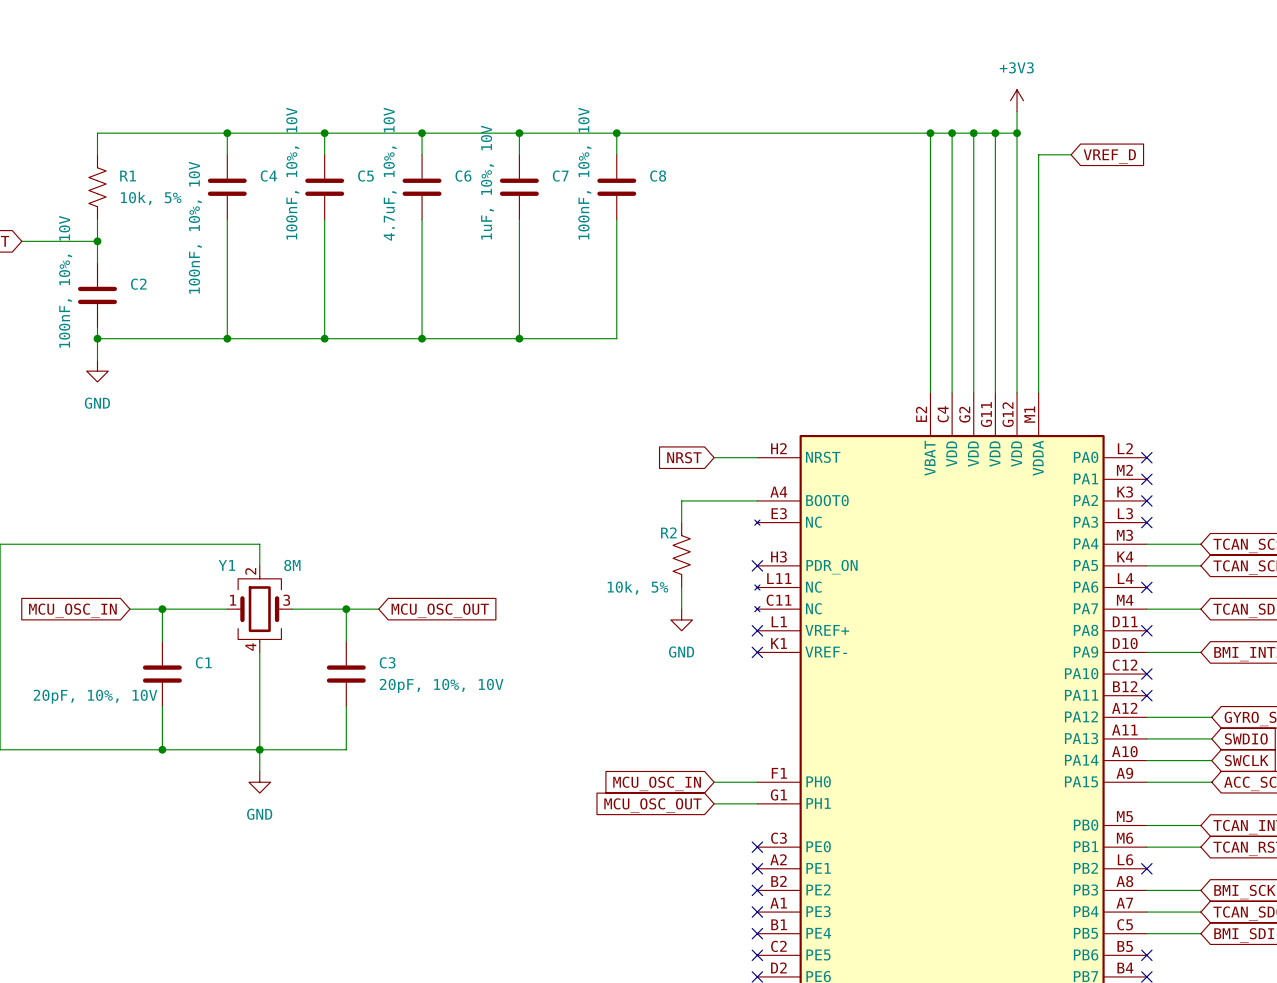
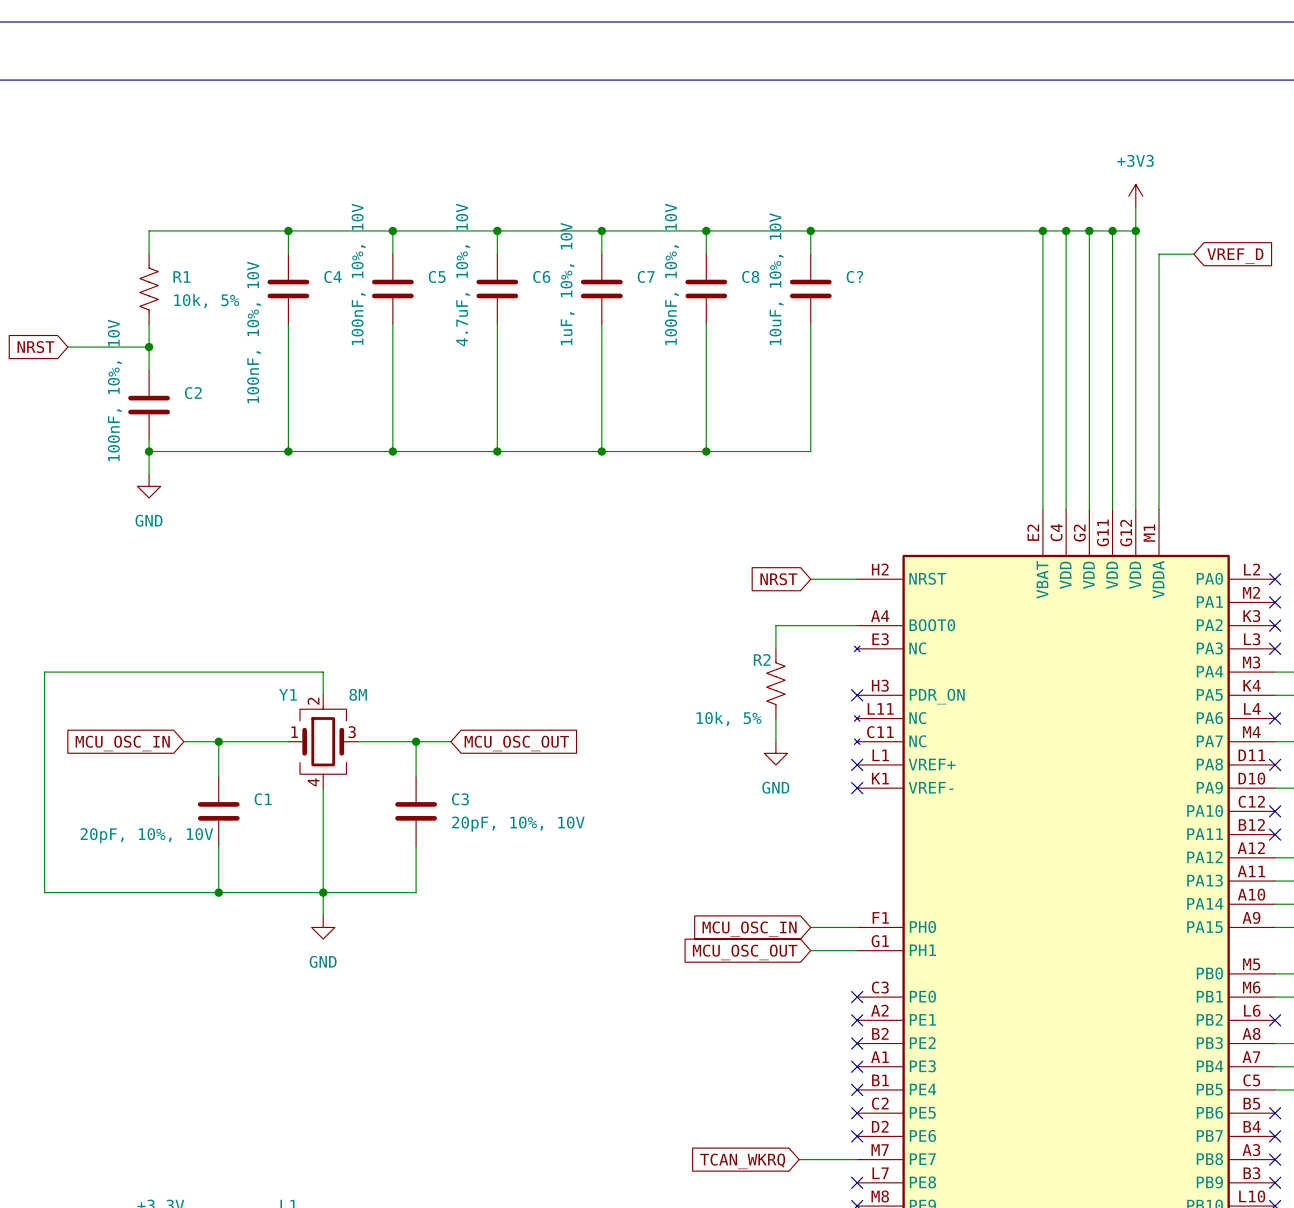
wire: none -> (810, 230) (810, 254)
junction: none -> (810, 230)
C?: none -> 10uF, 10%, 10V (810, 289)
wire: none -> (810, 323) (810, 451) (706, 451)
junction: none -> (706, 451)

